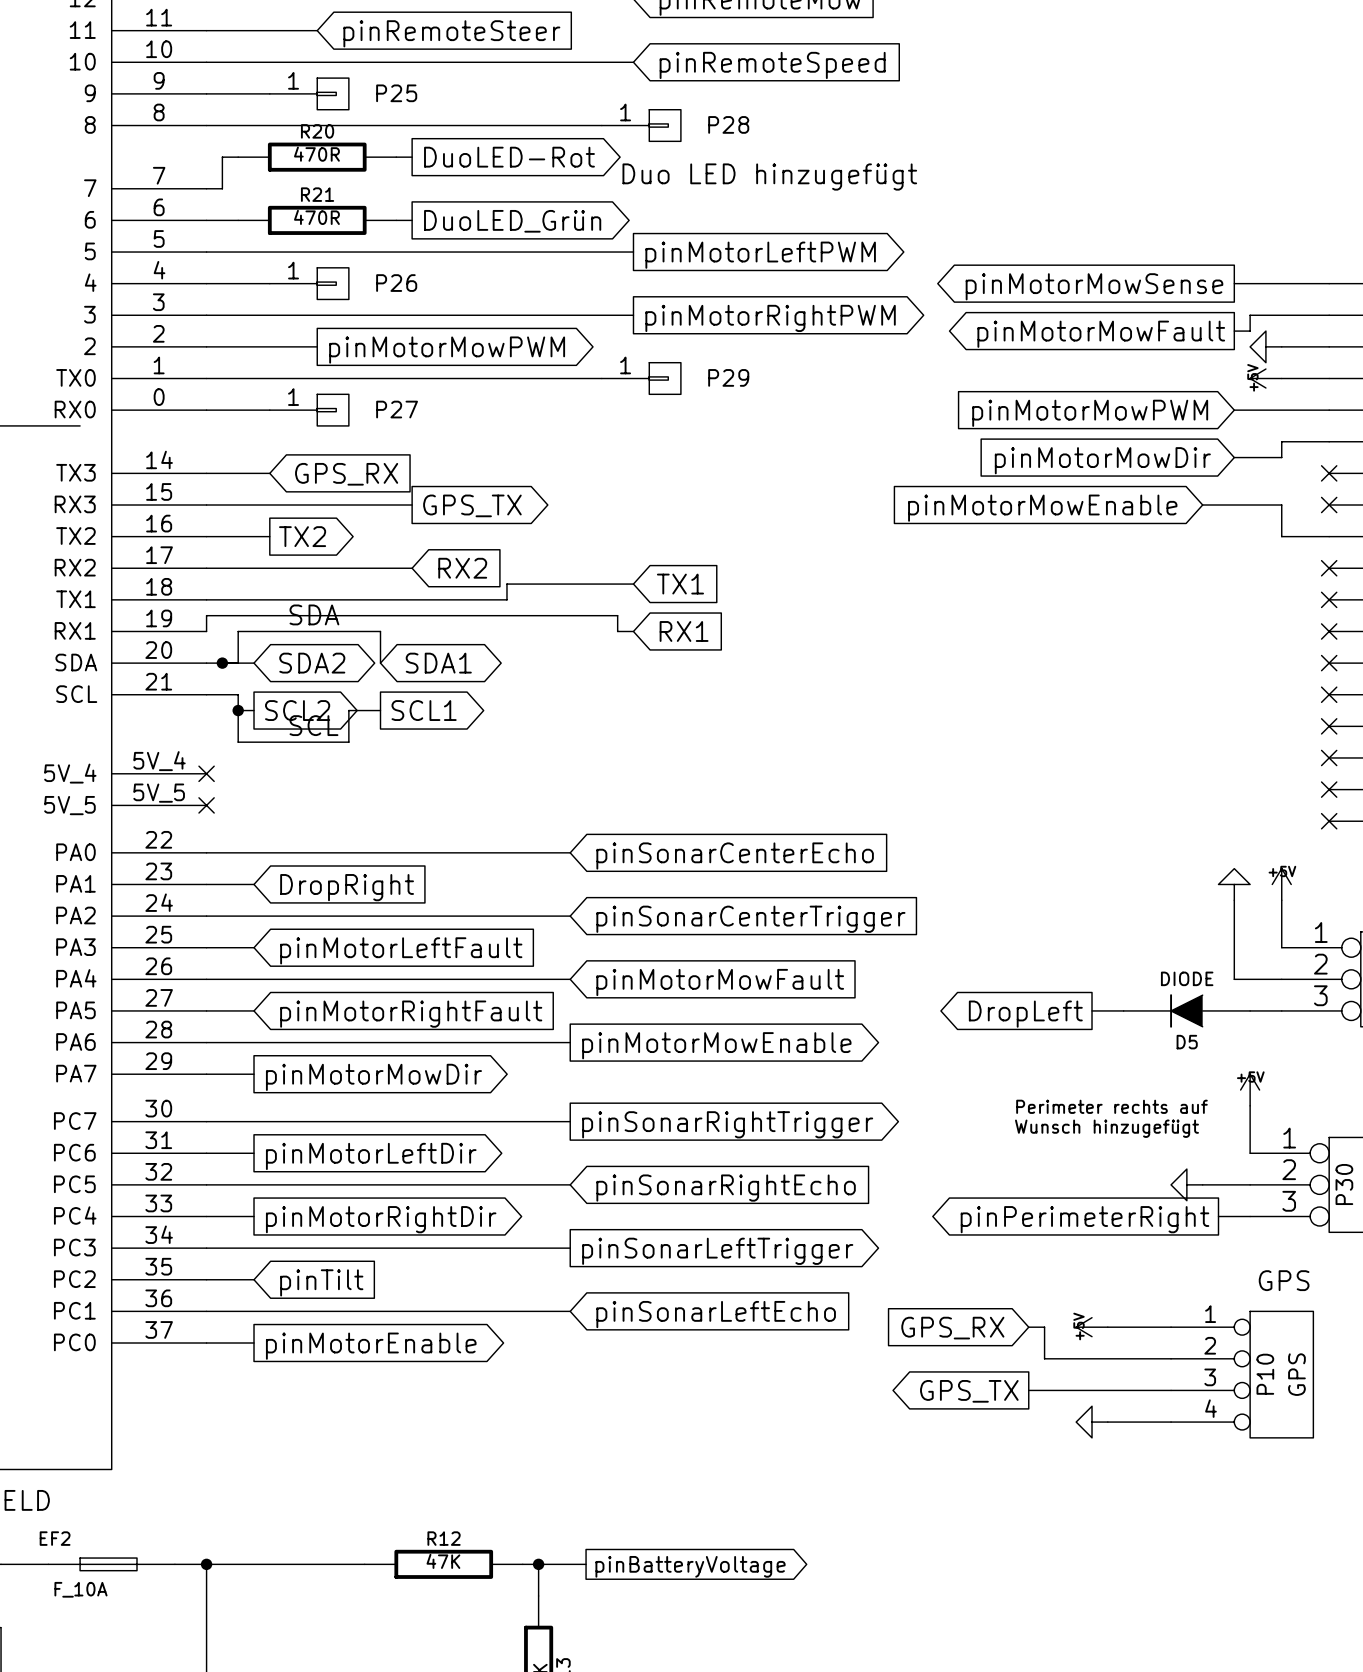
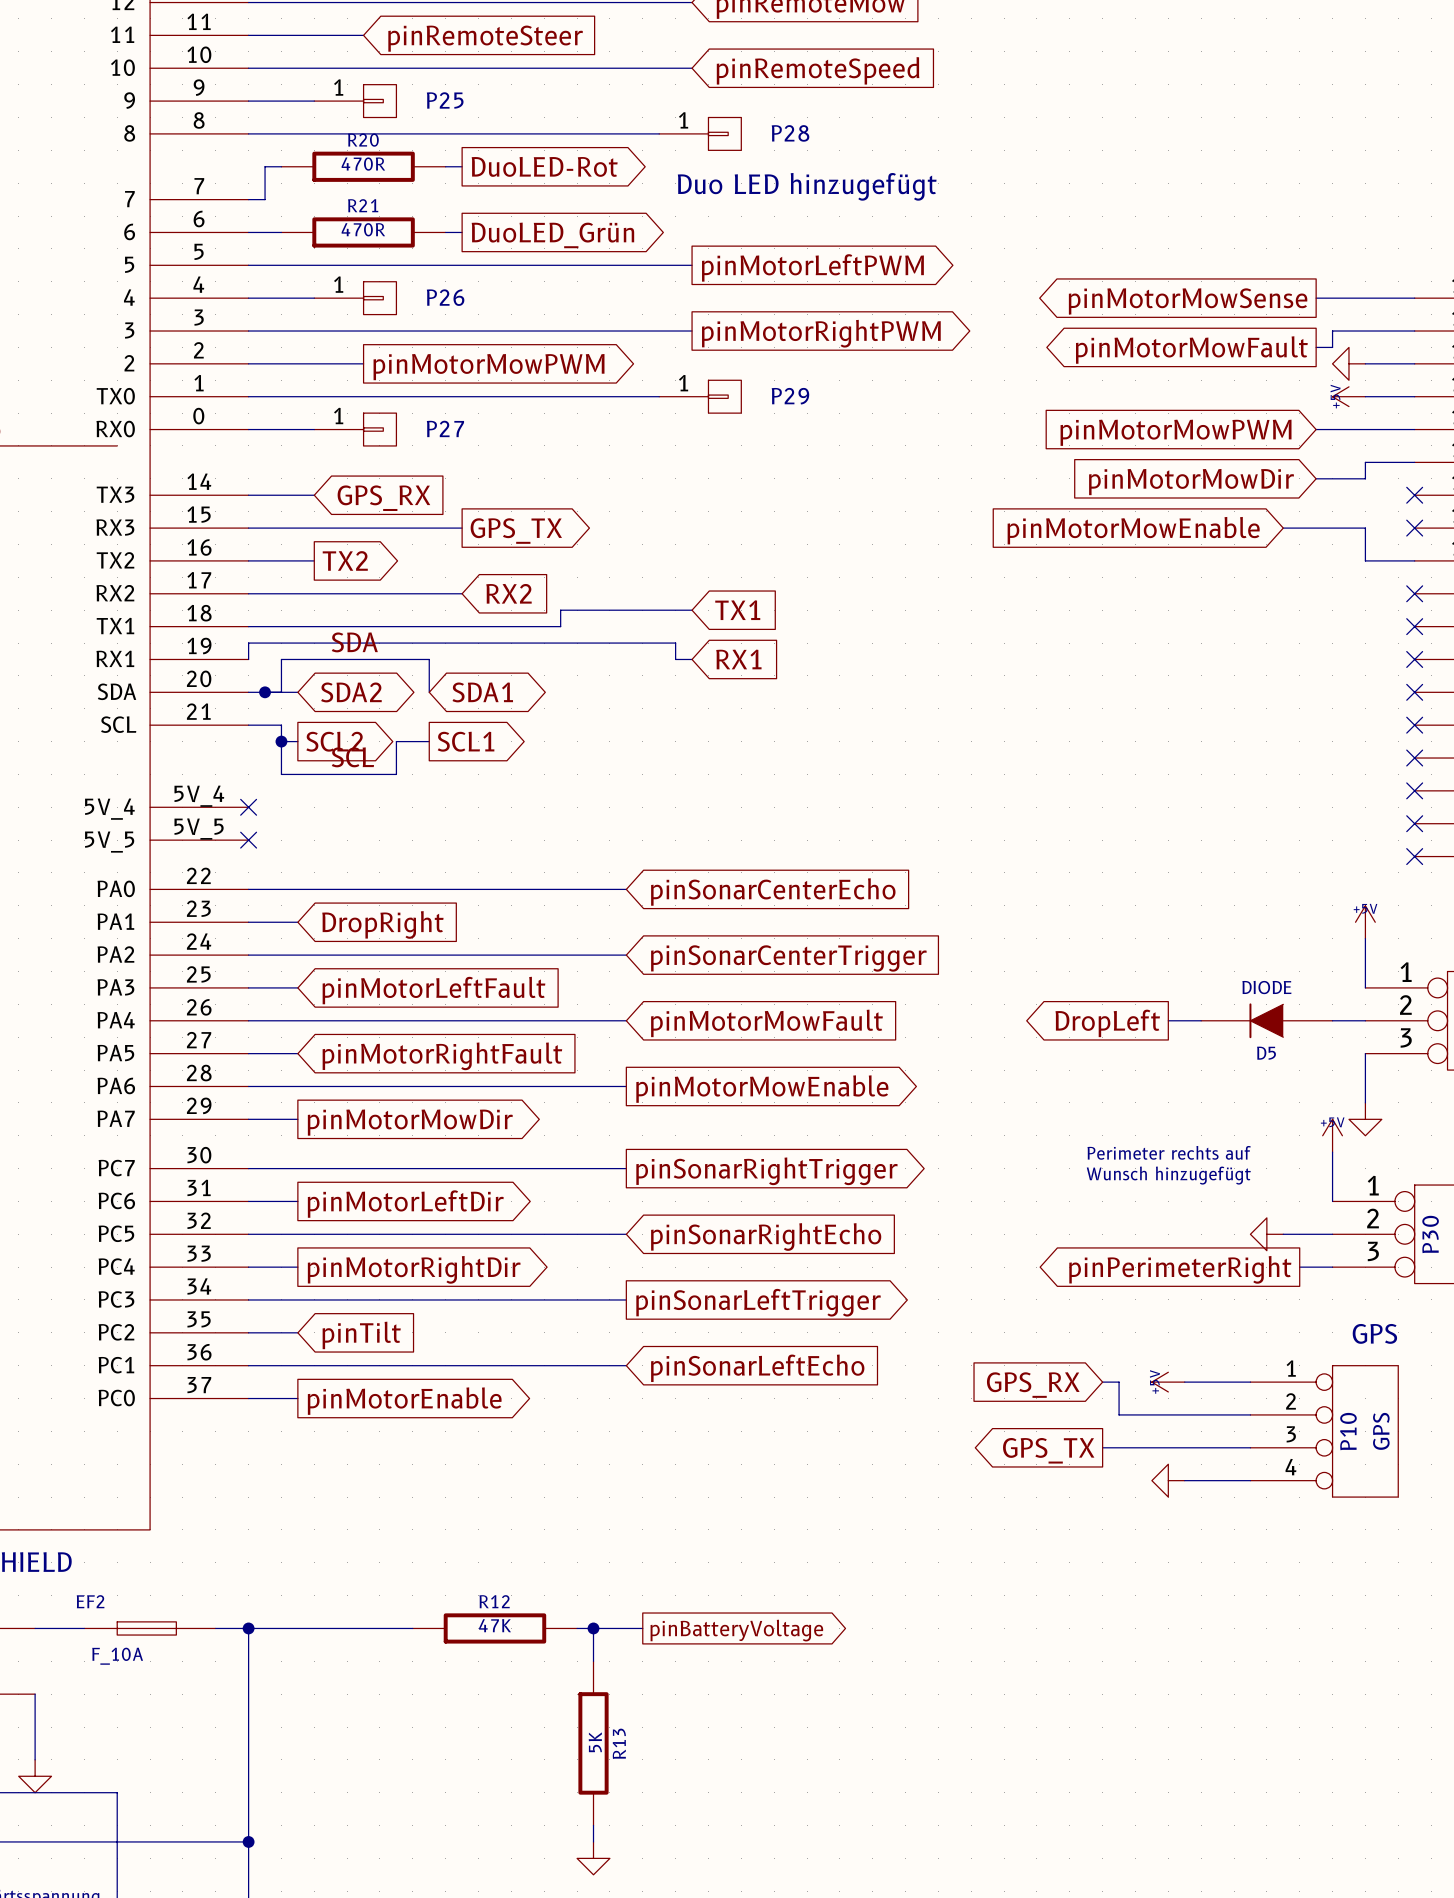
power symbol rotation: 0° (1234, 884) -> 180° (1365, 1119)
power symbol position: (1234, 884) -> (1365, 1119)
wire: (1234, 900) (1234, 979) (1250, 979) -> none
wire: (1092, 1010) (1123, 1010) -> (1168, 1020) (1201, 1020)
D5 position: (1186, 1010) -> (1266, 1020)
wire: (1250, 1010) (1281, 1010) -> (1365, 1102) (1365, 1053)
global label position: DropLeft (1025, 1014) -> DropLeft (1107, 1023)

